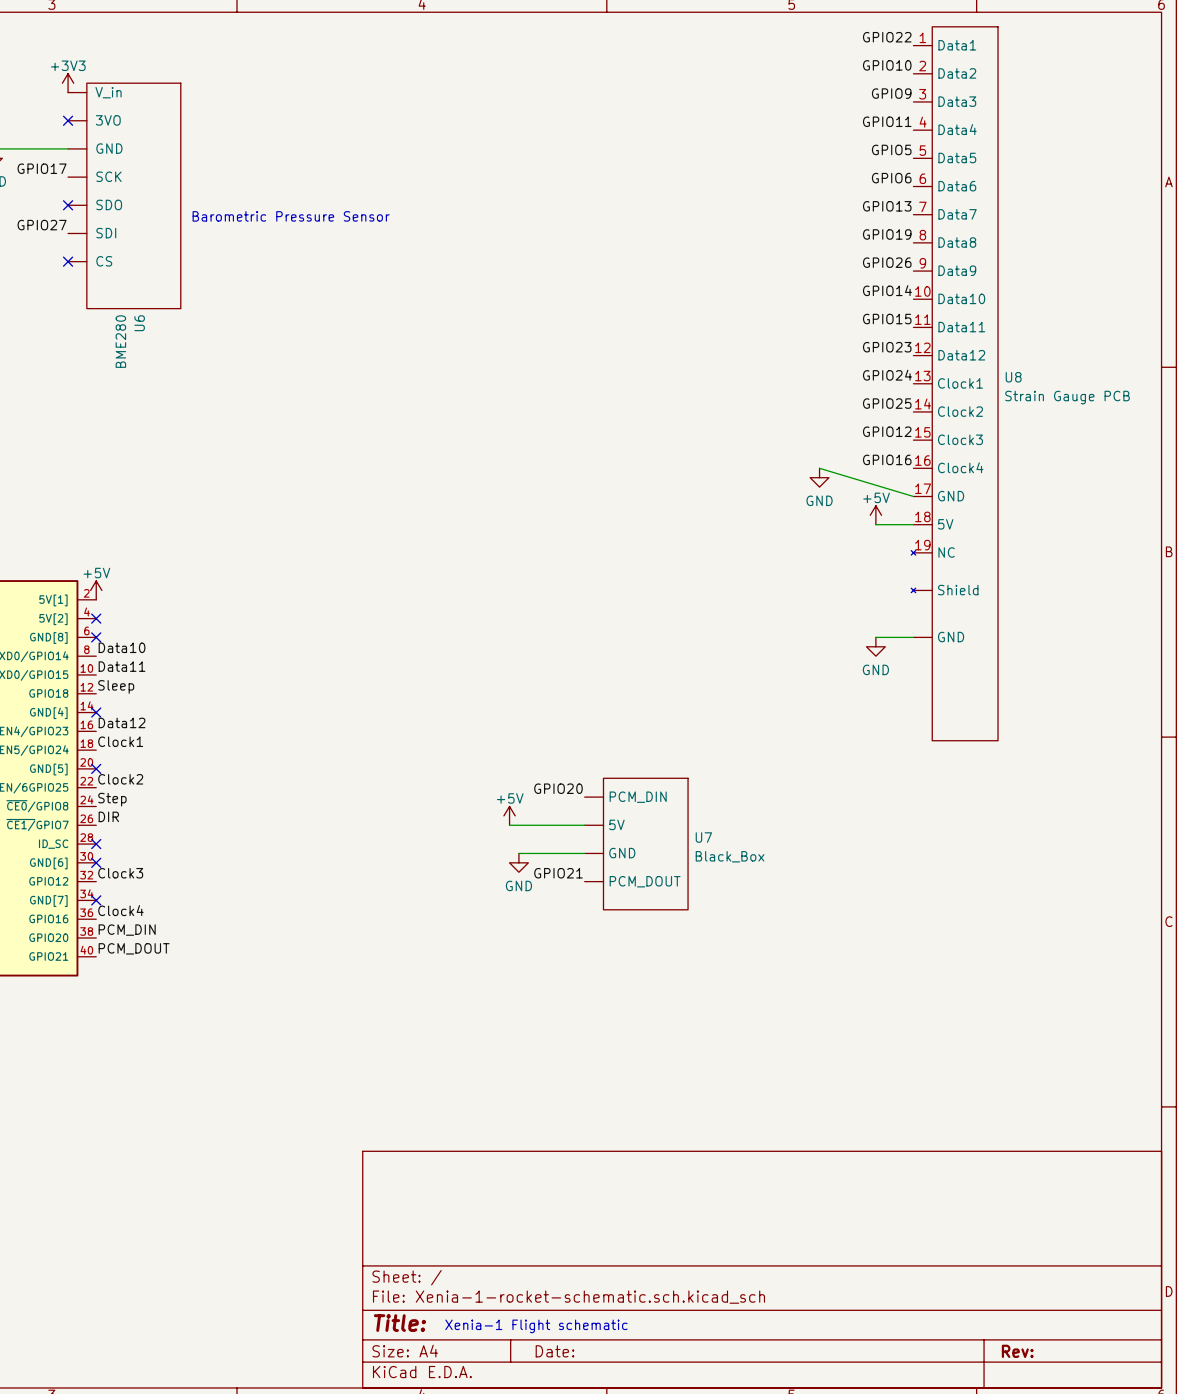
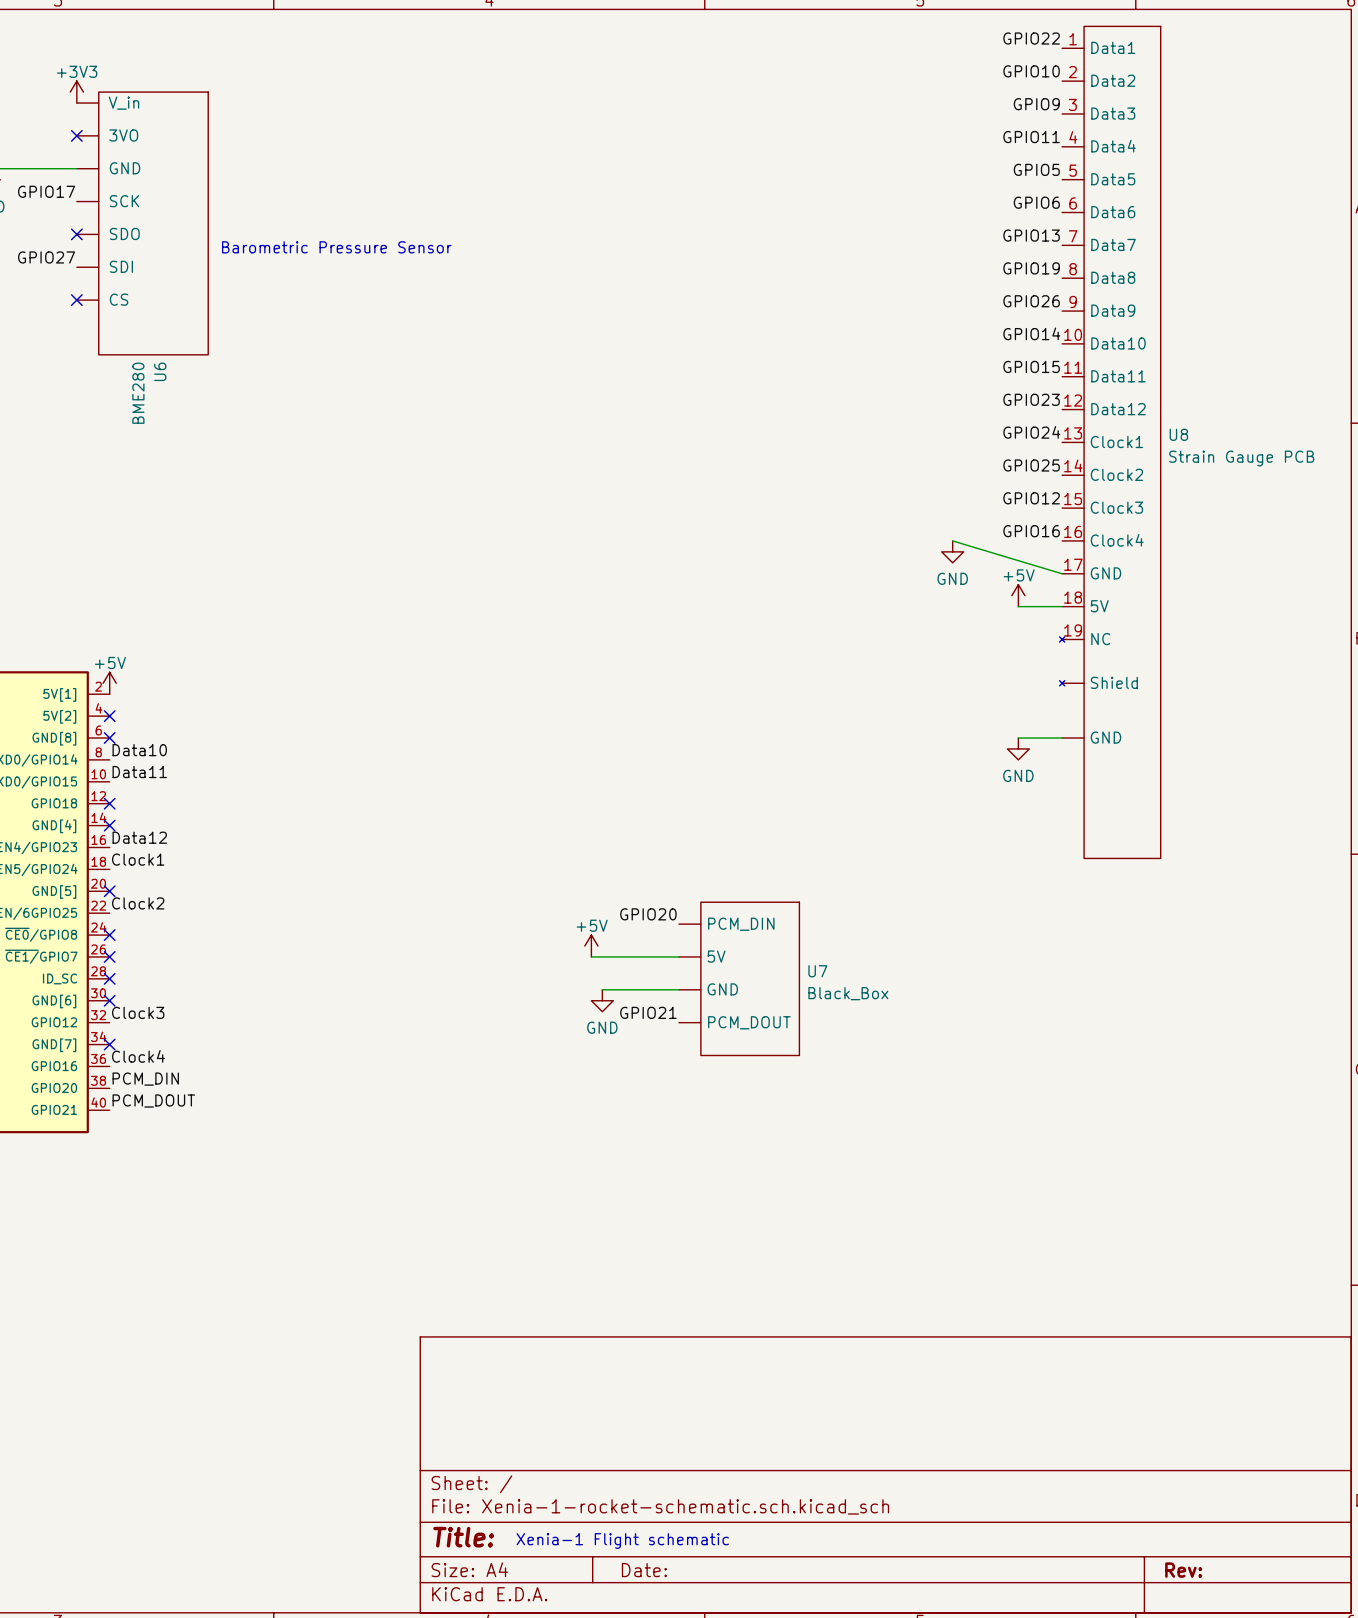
label: Sleep (116, 686) -> none
no-connect mark: none -> (109, 803)
label: Step (112, 799) -> none
no-connect mark: none -> (109, 935)
label: DIR (108, 816) -> none
no-connect mark: none -> (109, 956)

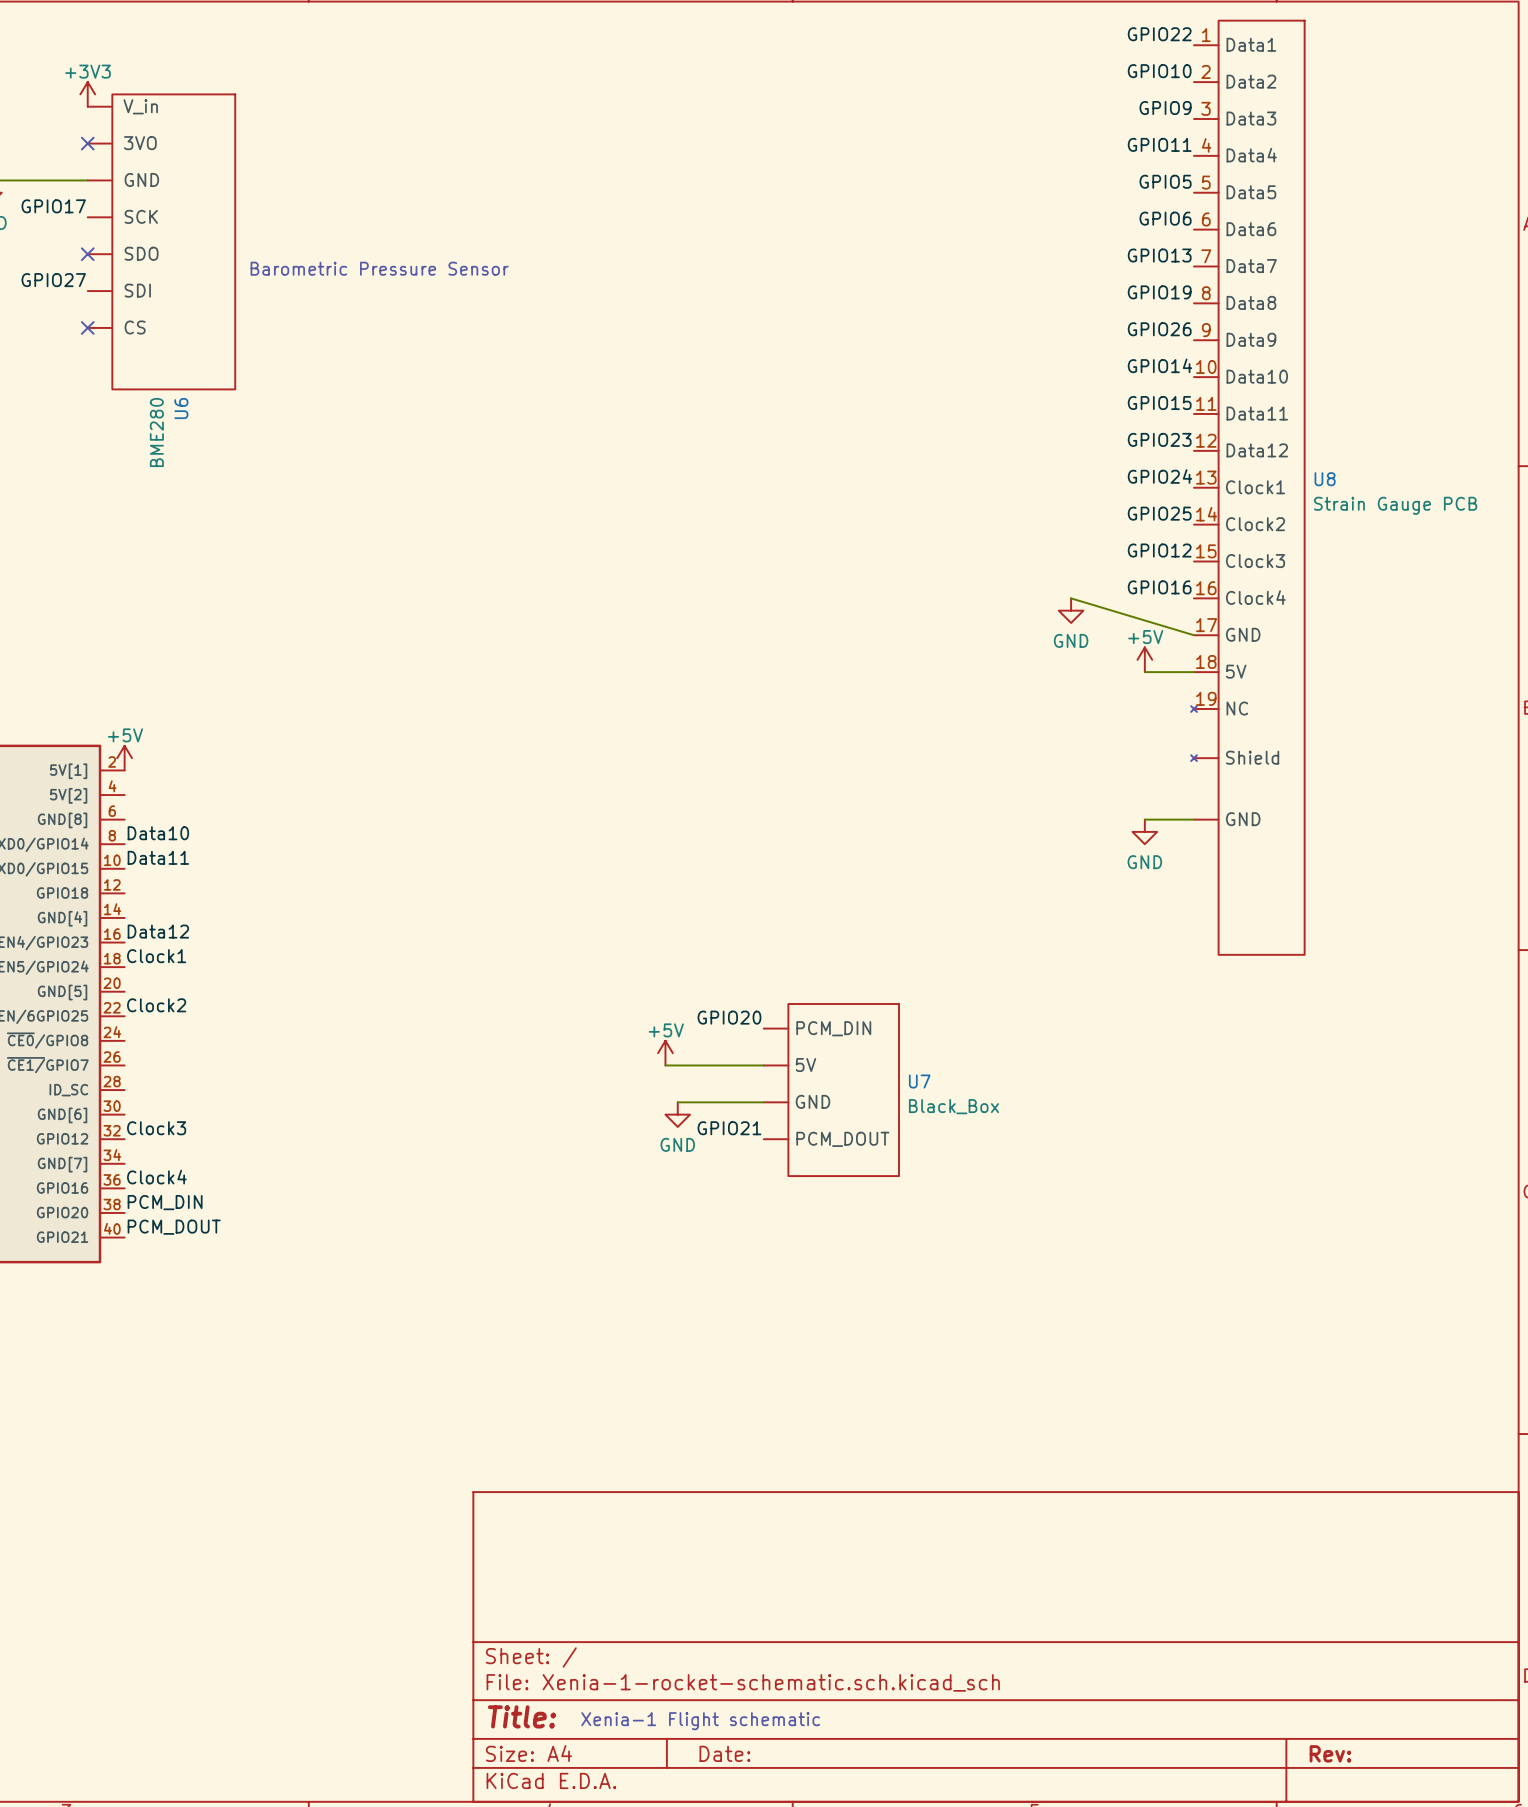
no-connect mark: (109, 716) -> none
no-connect mark: (109, 738) -> none
no-connect mark: (109, 803) -> none
no-connect mark: (109, 825) -> none
no-connect mark: (109, 891) -> none
no-connect mark: (109, 935) -> none
no-connect mark: (109, 956) -> none
no-connect mark: (109, 978) -> none
no-connect mark: (109, 1000) -> none
no-connect mark: (109, 1044) -> none

